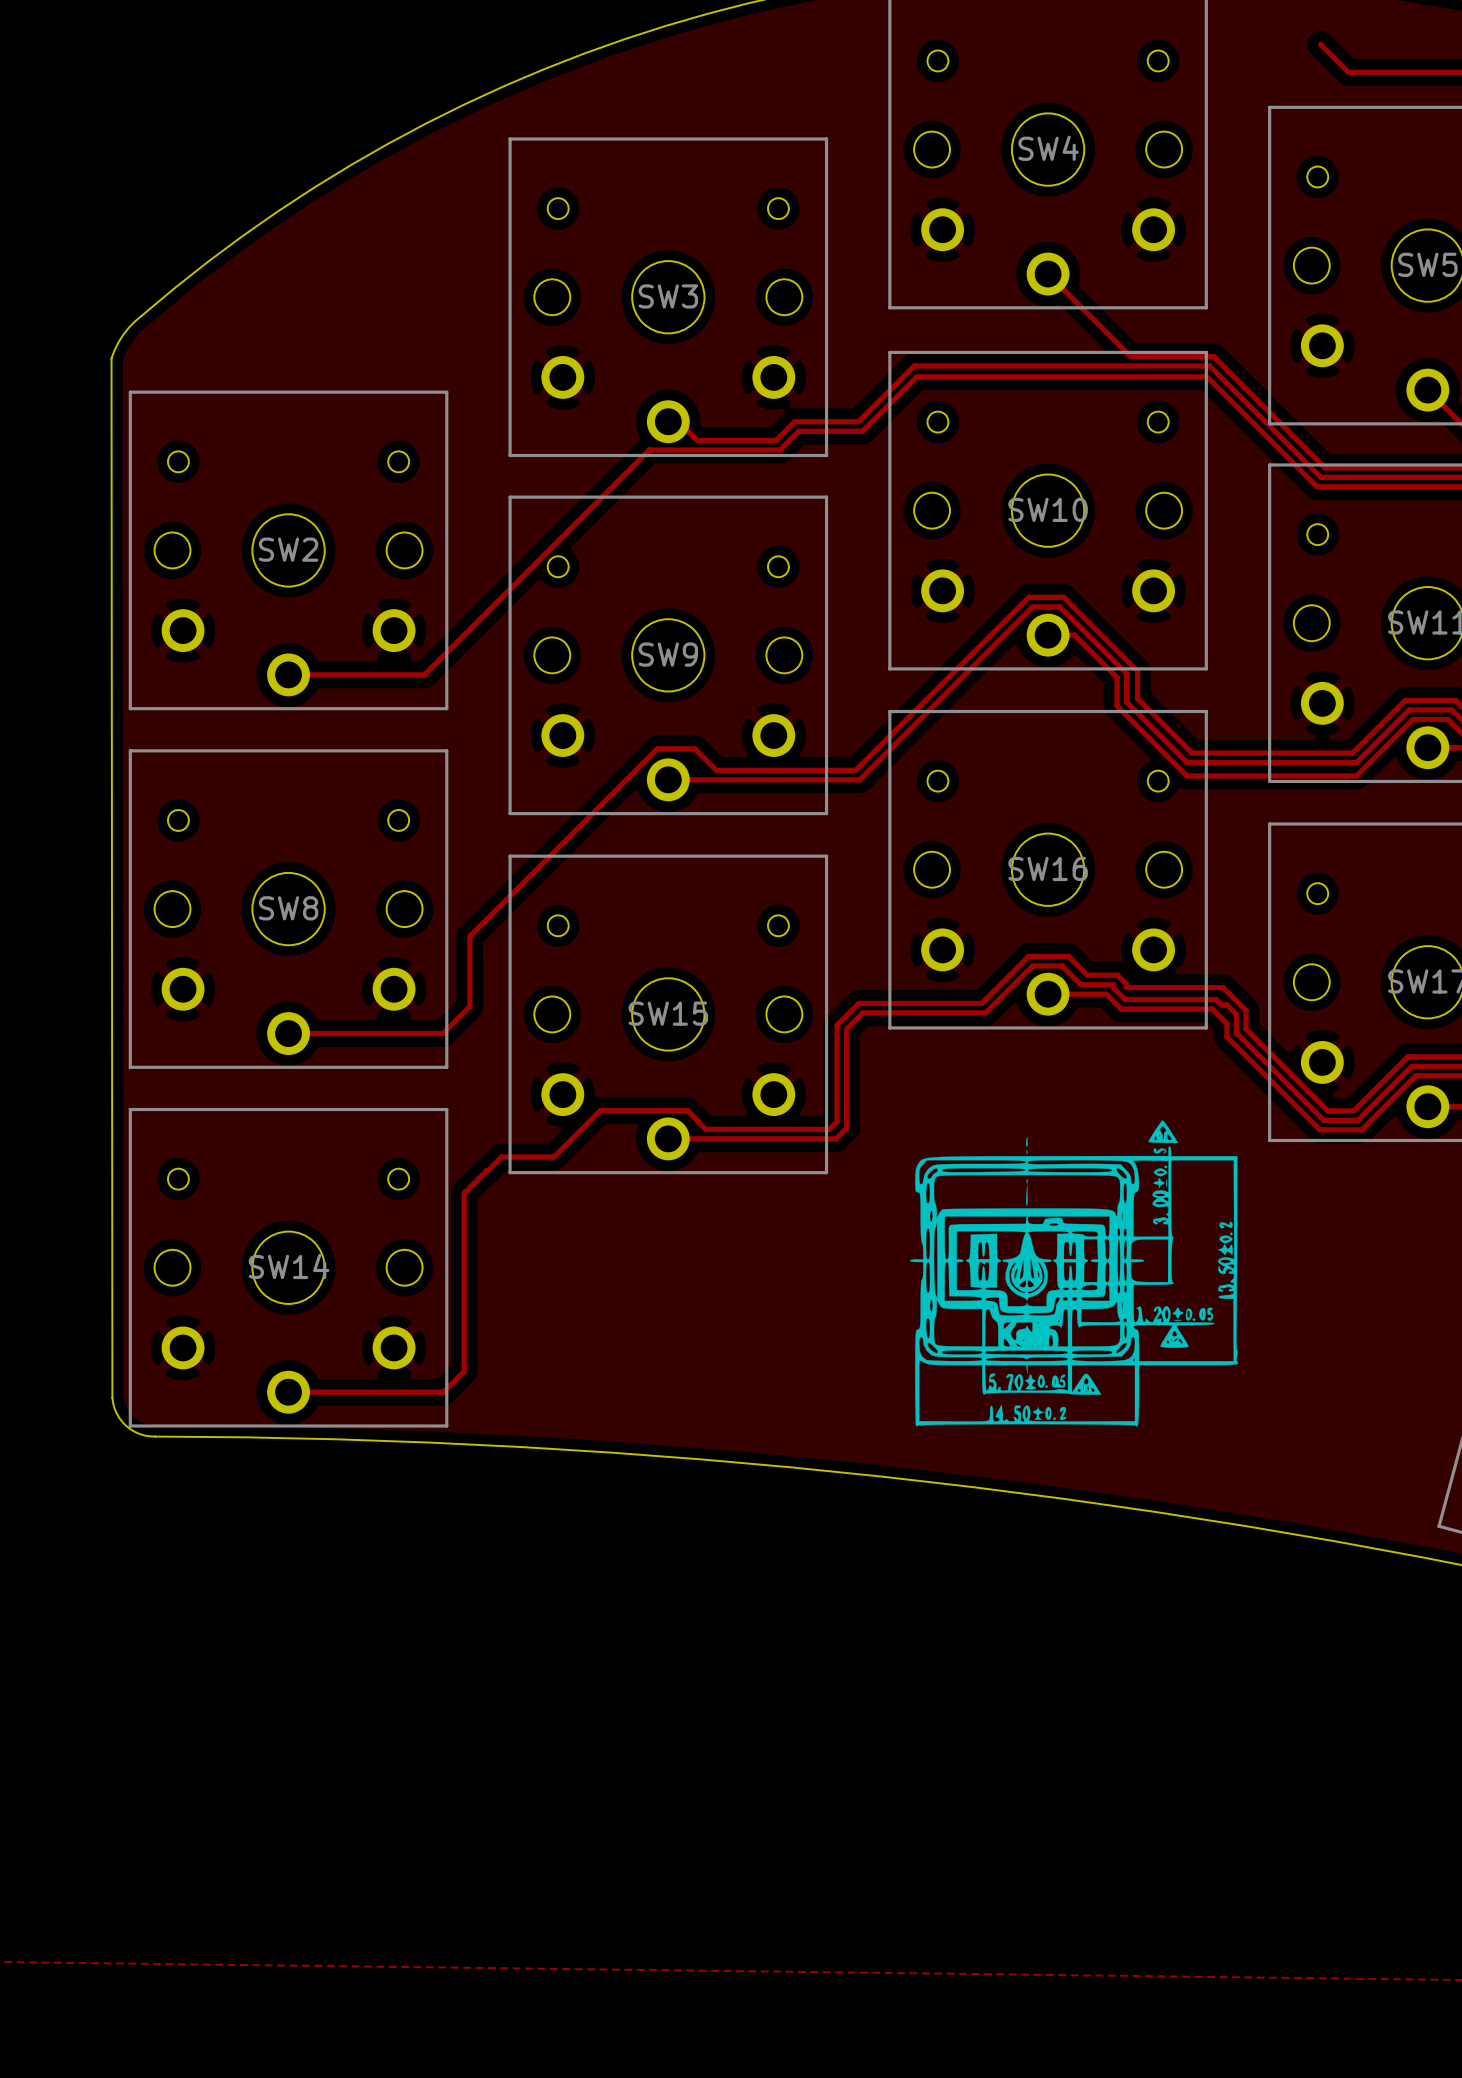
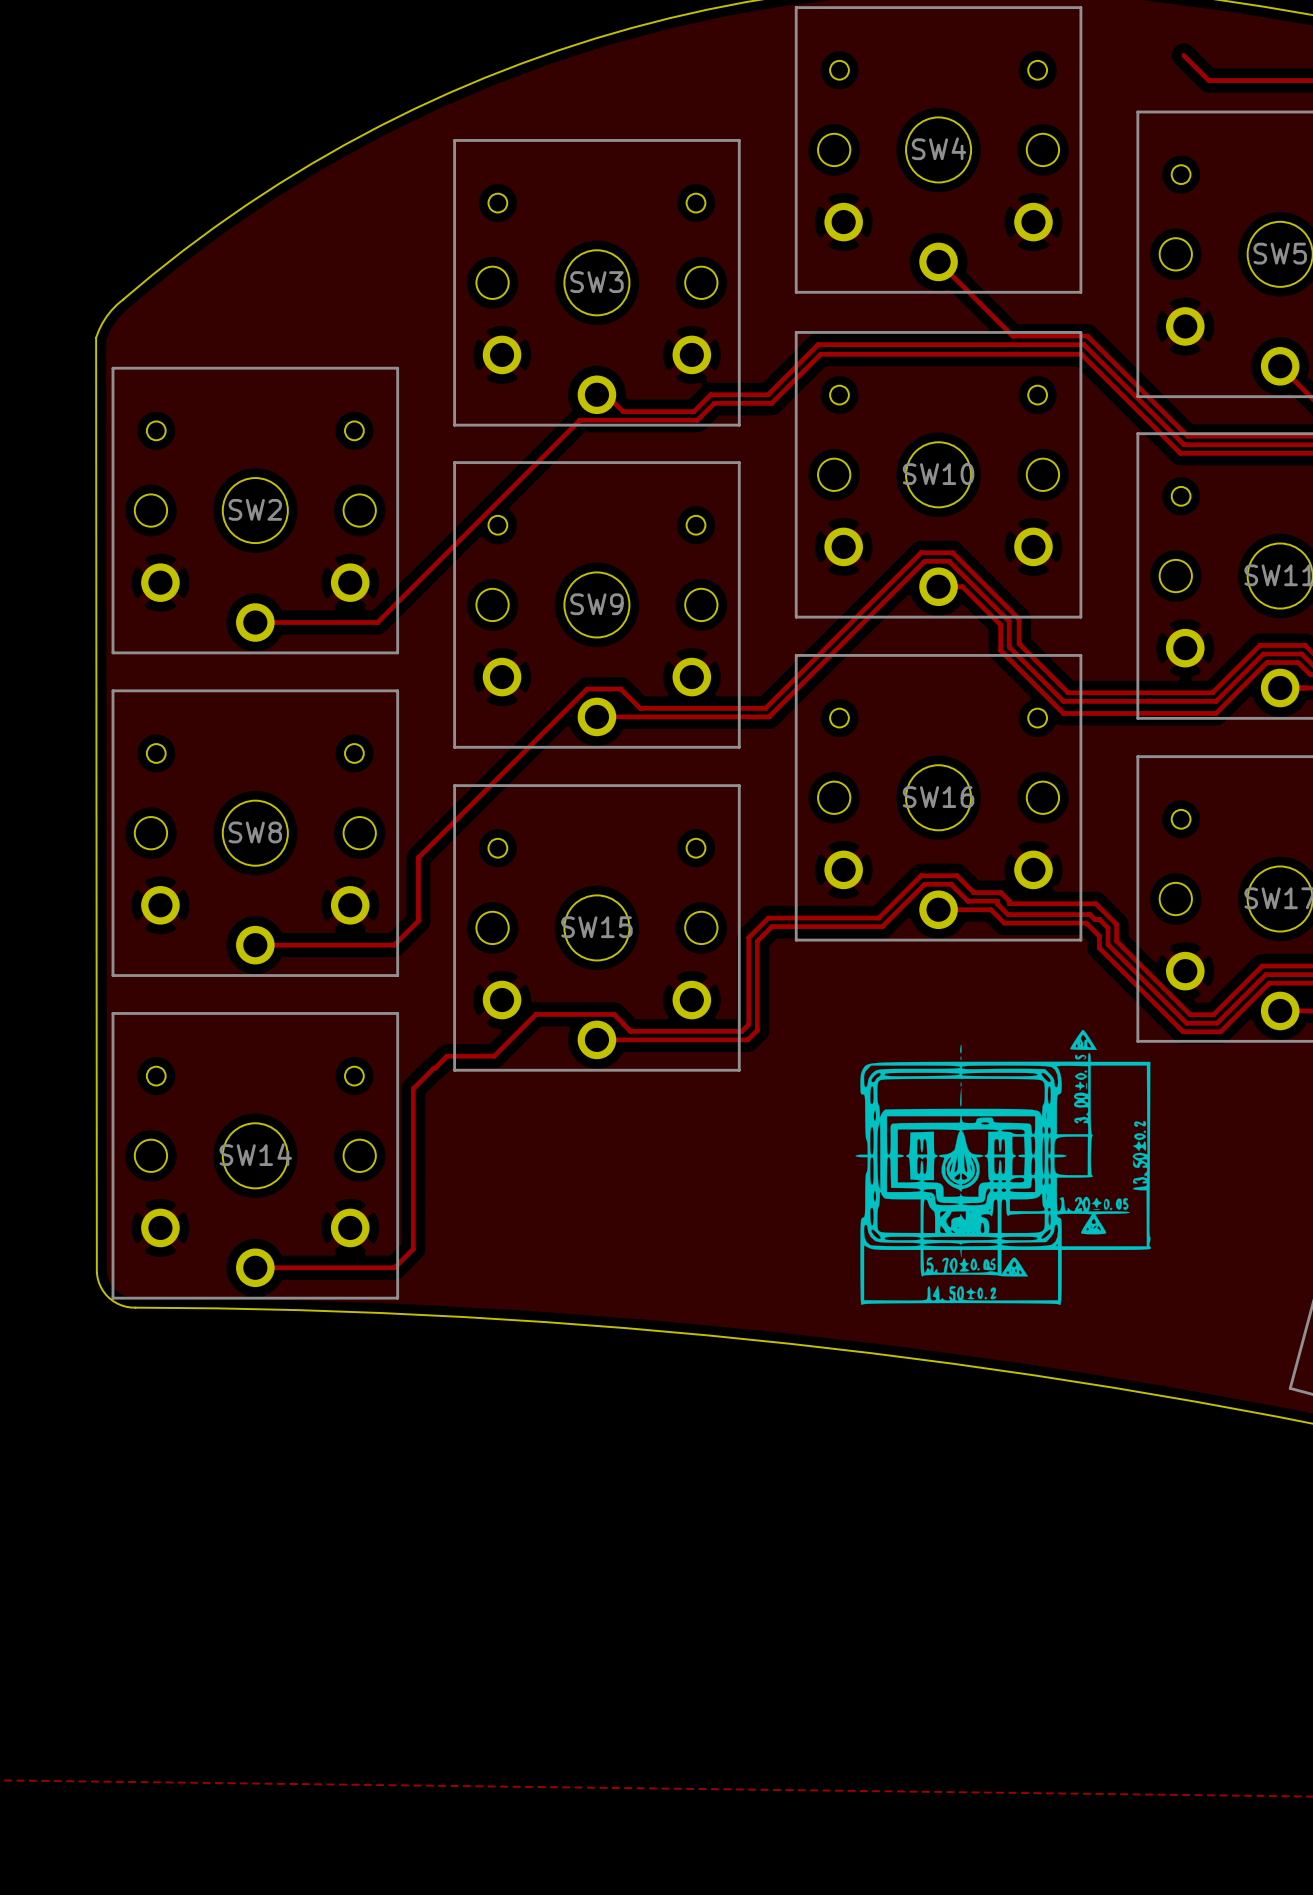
drawing position: (1074, 1273) -> (1003, 1167)

